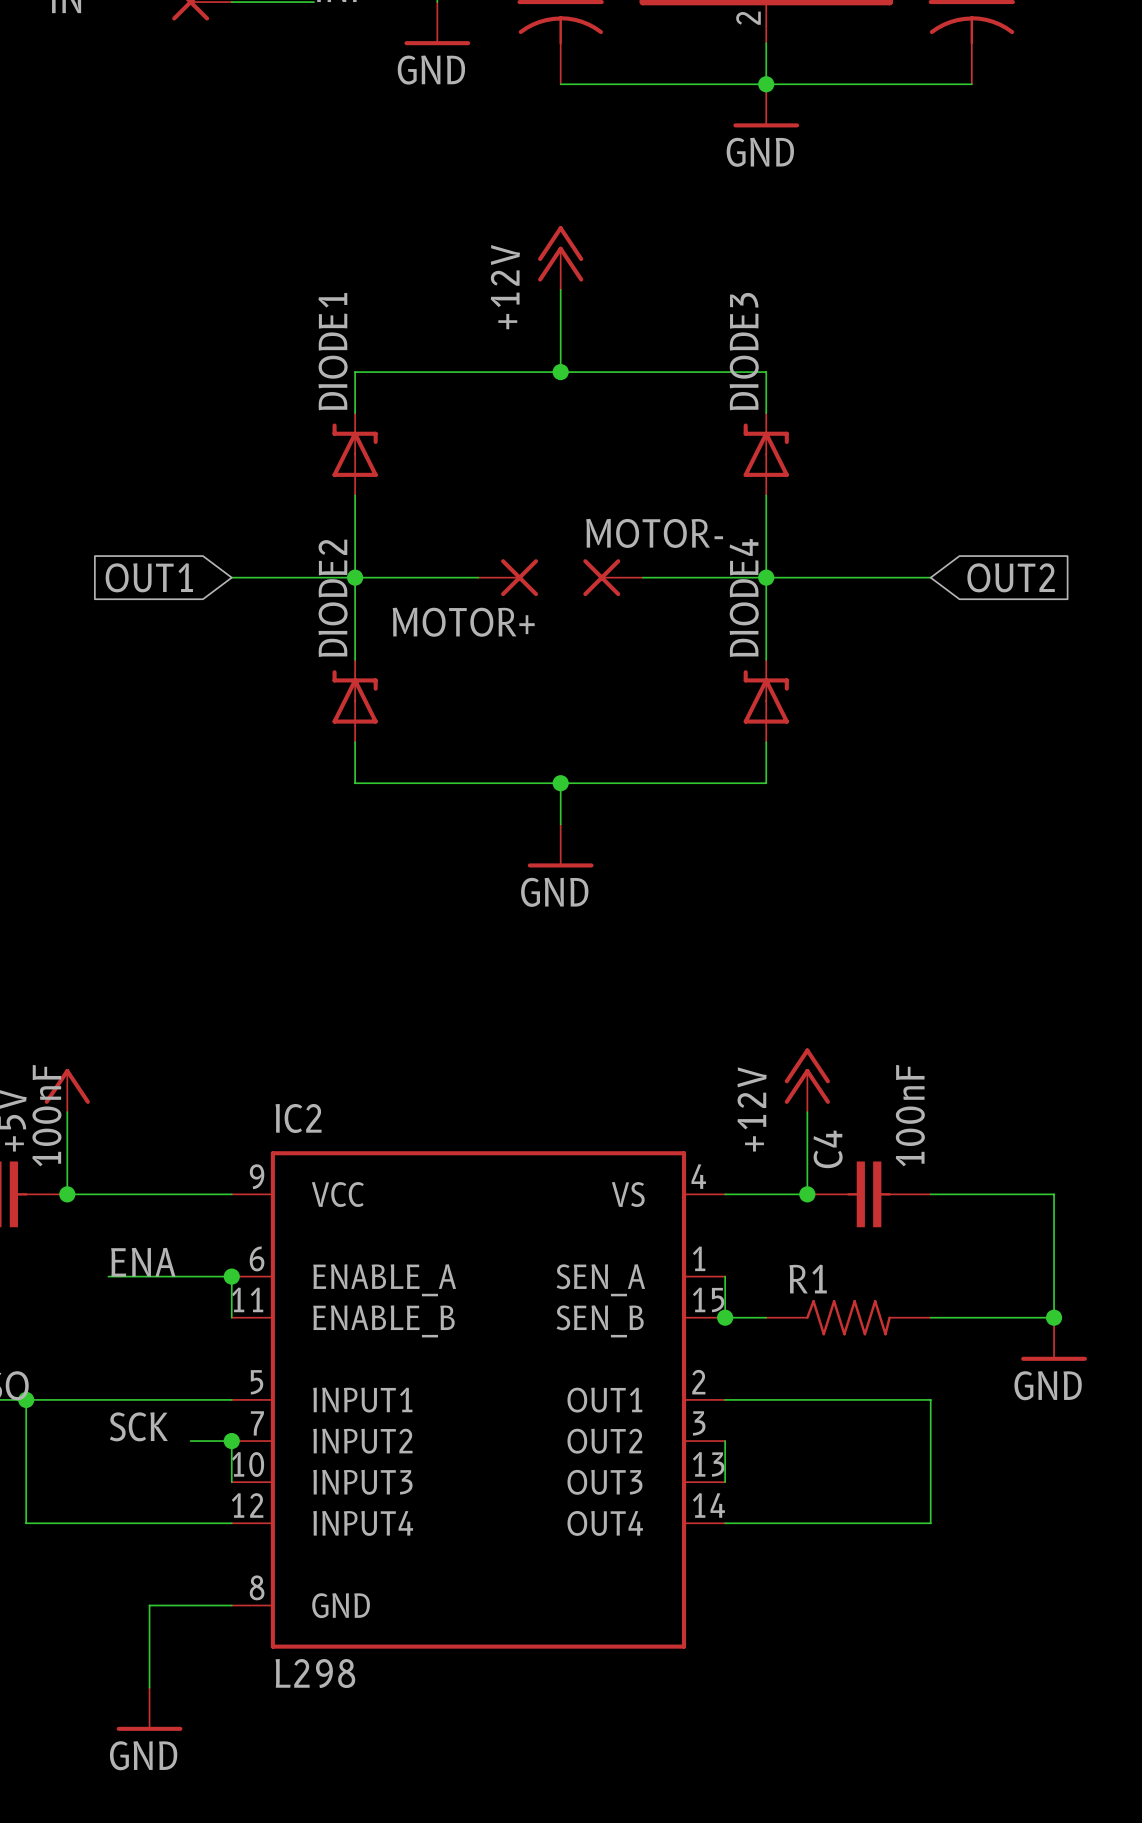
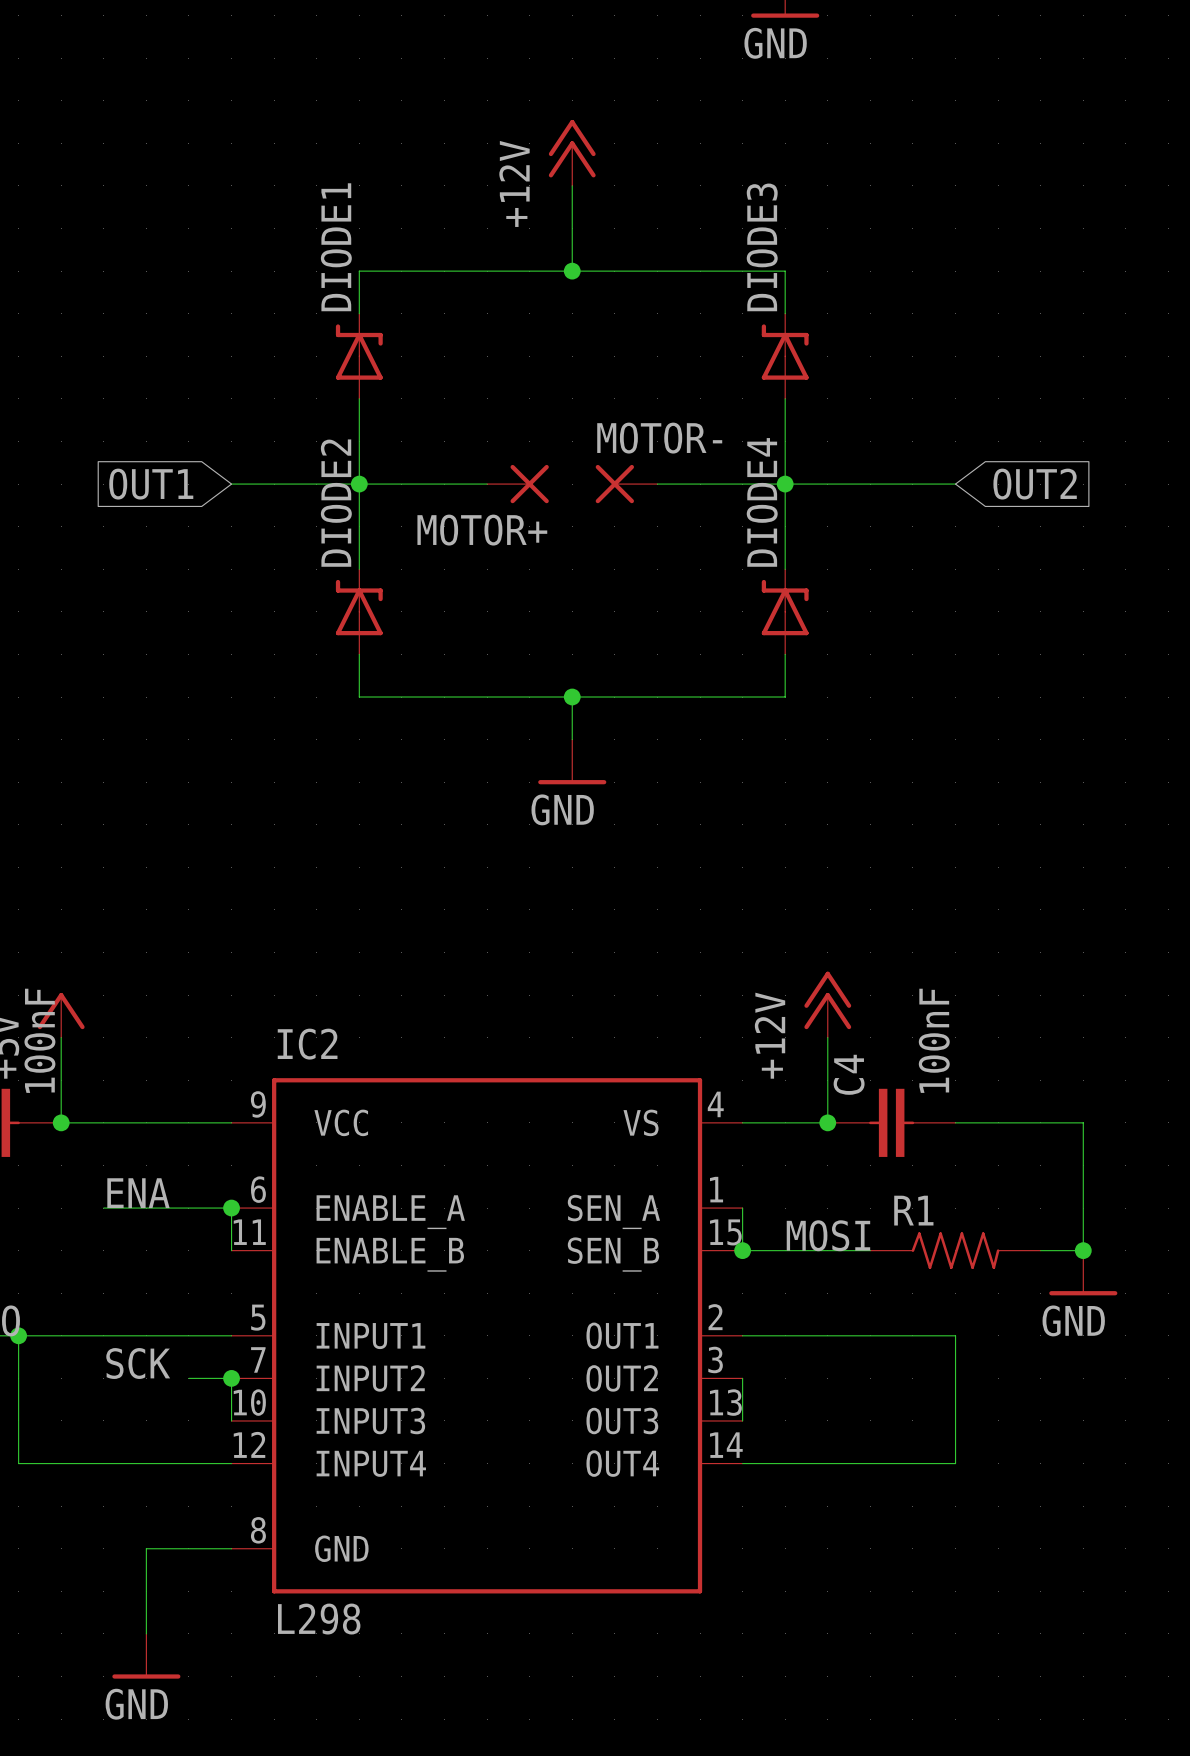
label: none -> MOSI (828, 1235)
R1 position: (848, 1317) -> (955, 1250)

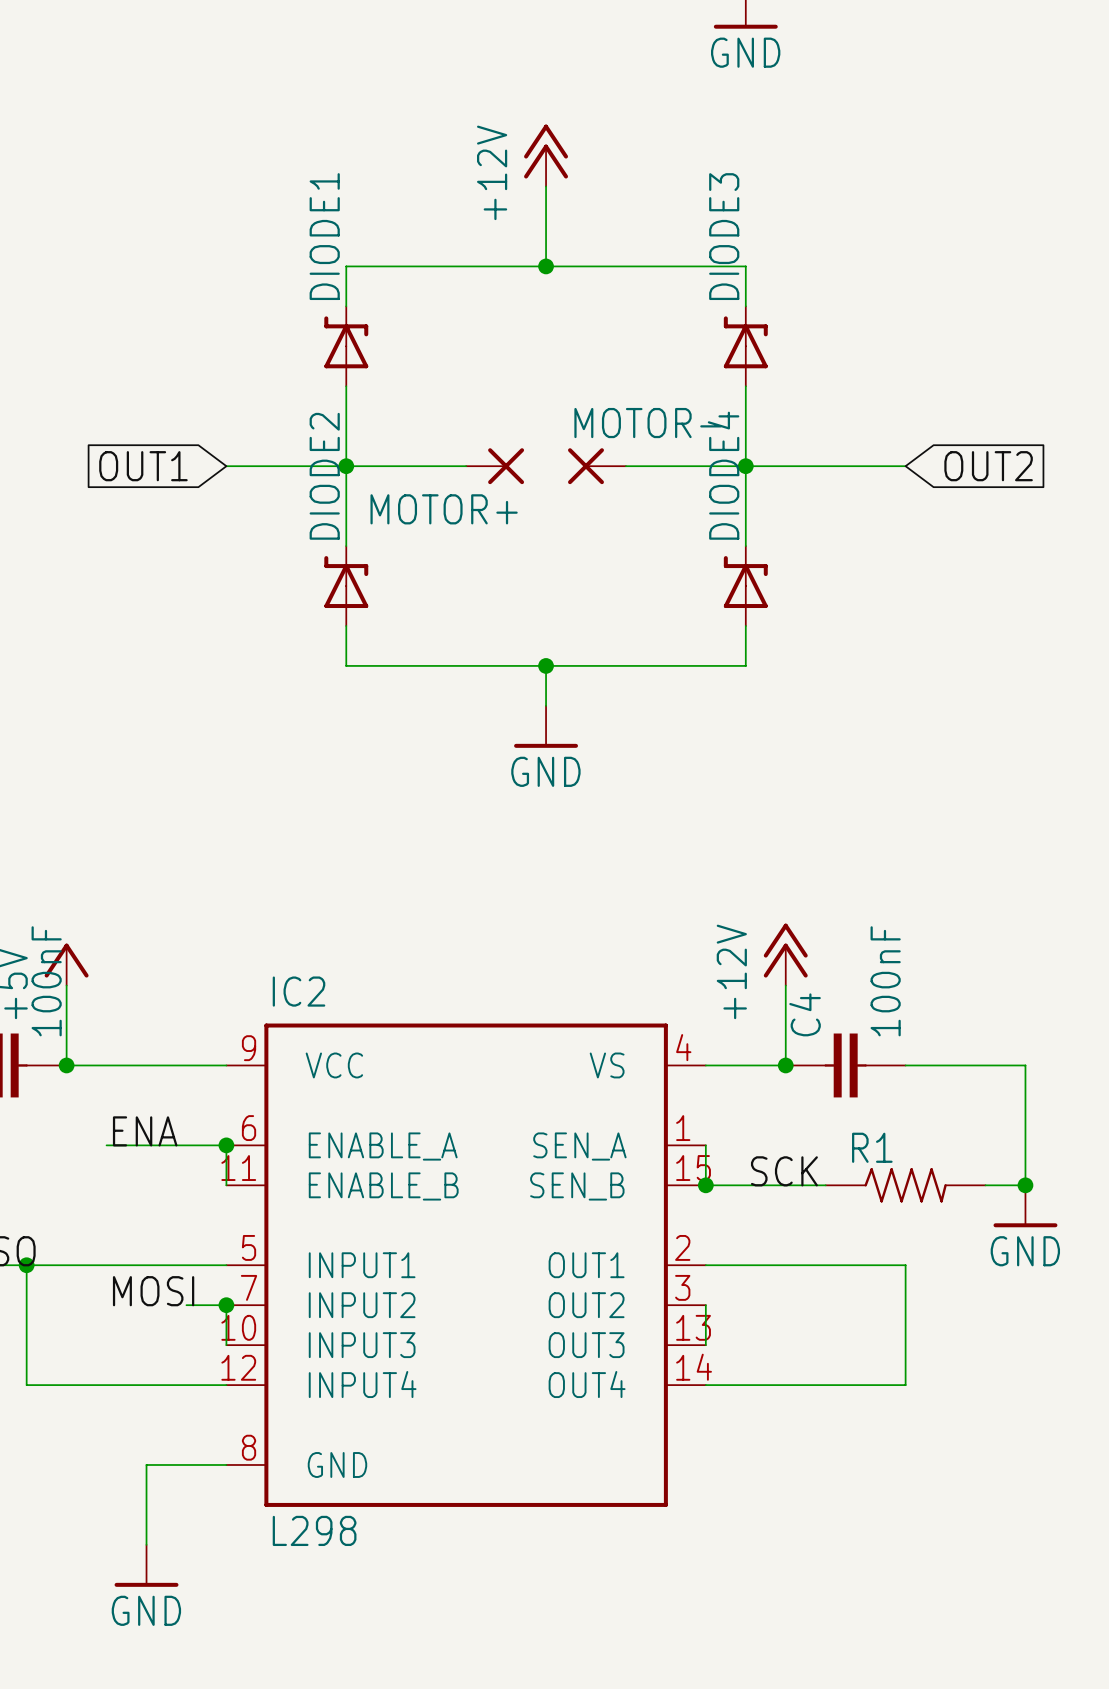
label: MOSI (828, 1235) -> SCK (784, 1171)
label: SCK (138, 1363) -> MOSI (153, 1291)

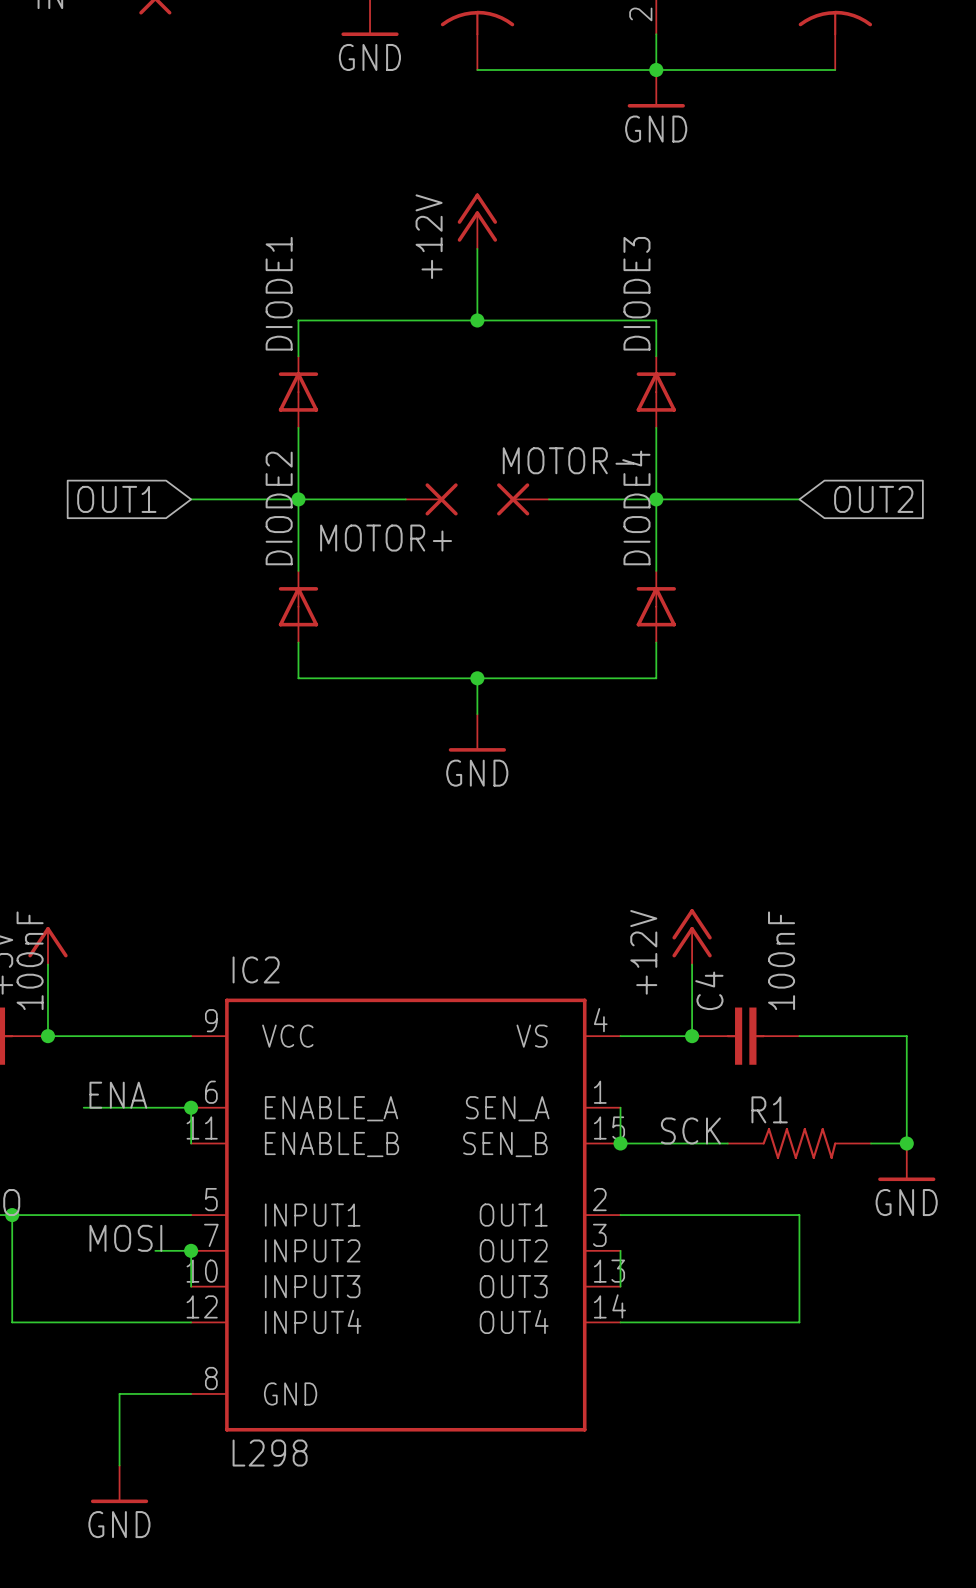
DIODE1 symbol: [324, 306, 369, 387] -> [278, 356, 319, 428]
DIODE3 symbol: [723, 306, 768, 387] -> [636, 356, 676, 428]
DIODE2 symbol: [324, 546, 369, 626] -> [278, 570, 319, 643]
DIODE4 symbol: [723, 546, 768, 626] -> [636, 570, 676, 643]

